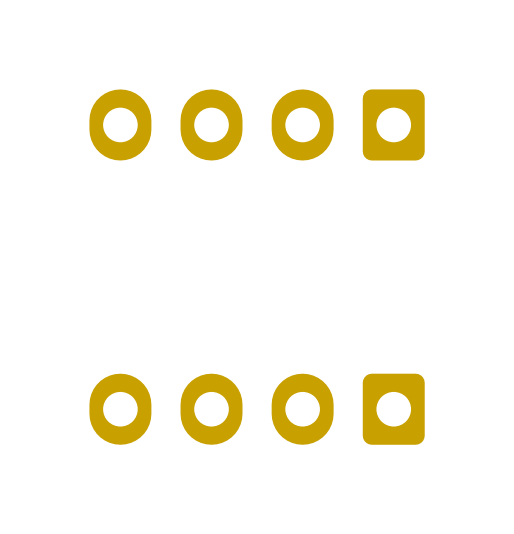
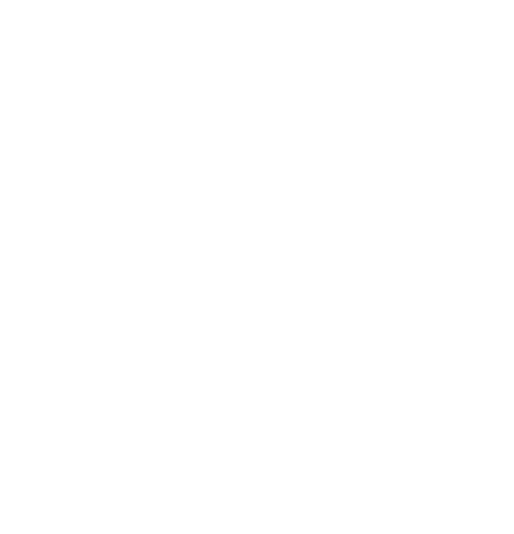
part: (257, 124) -> none
part: (257, 409) -> none

